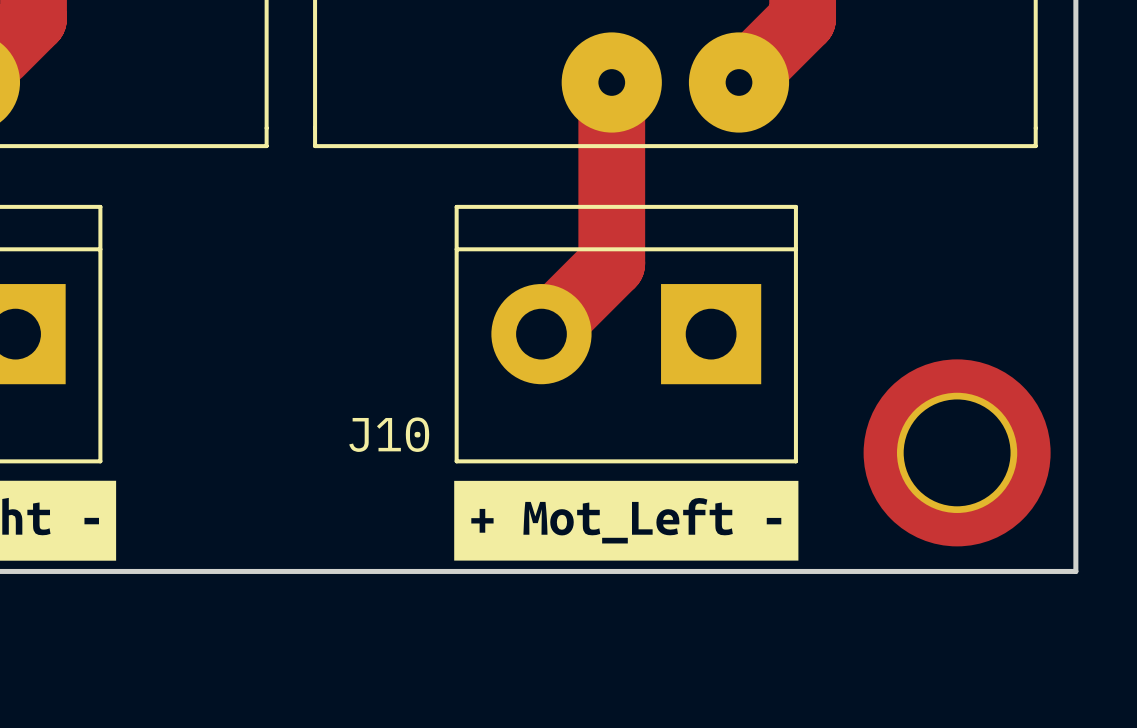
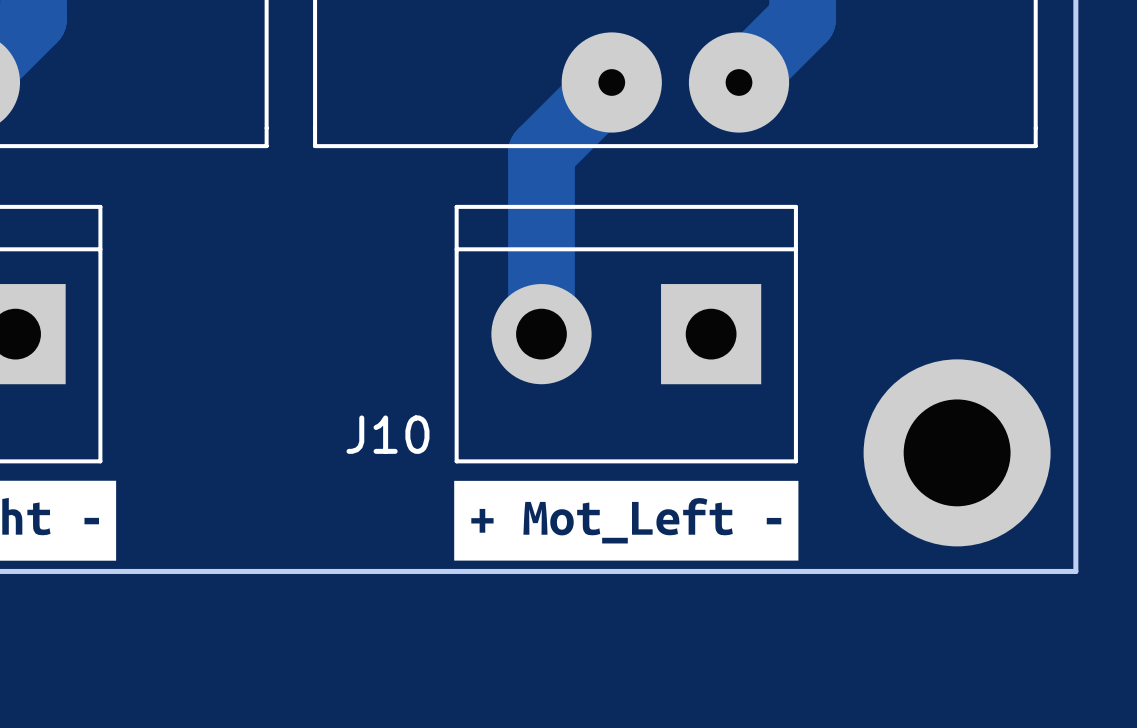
track: (611, 82) (611, 263) (541, 334) -> (611, 82) (541, 152) (541, 334)

